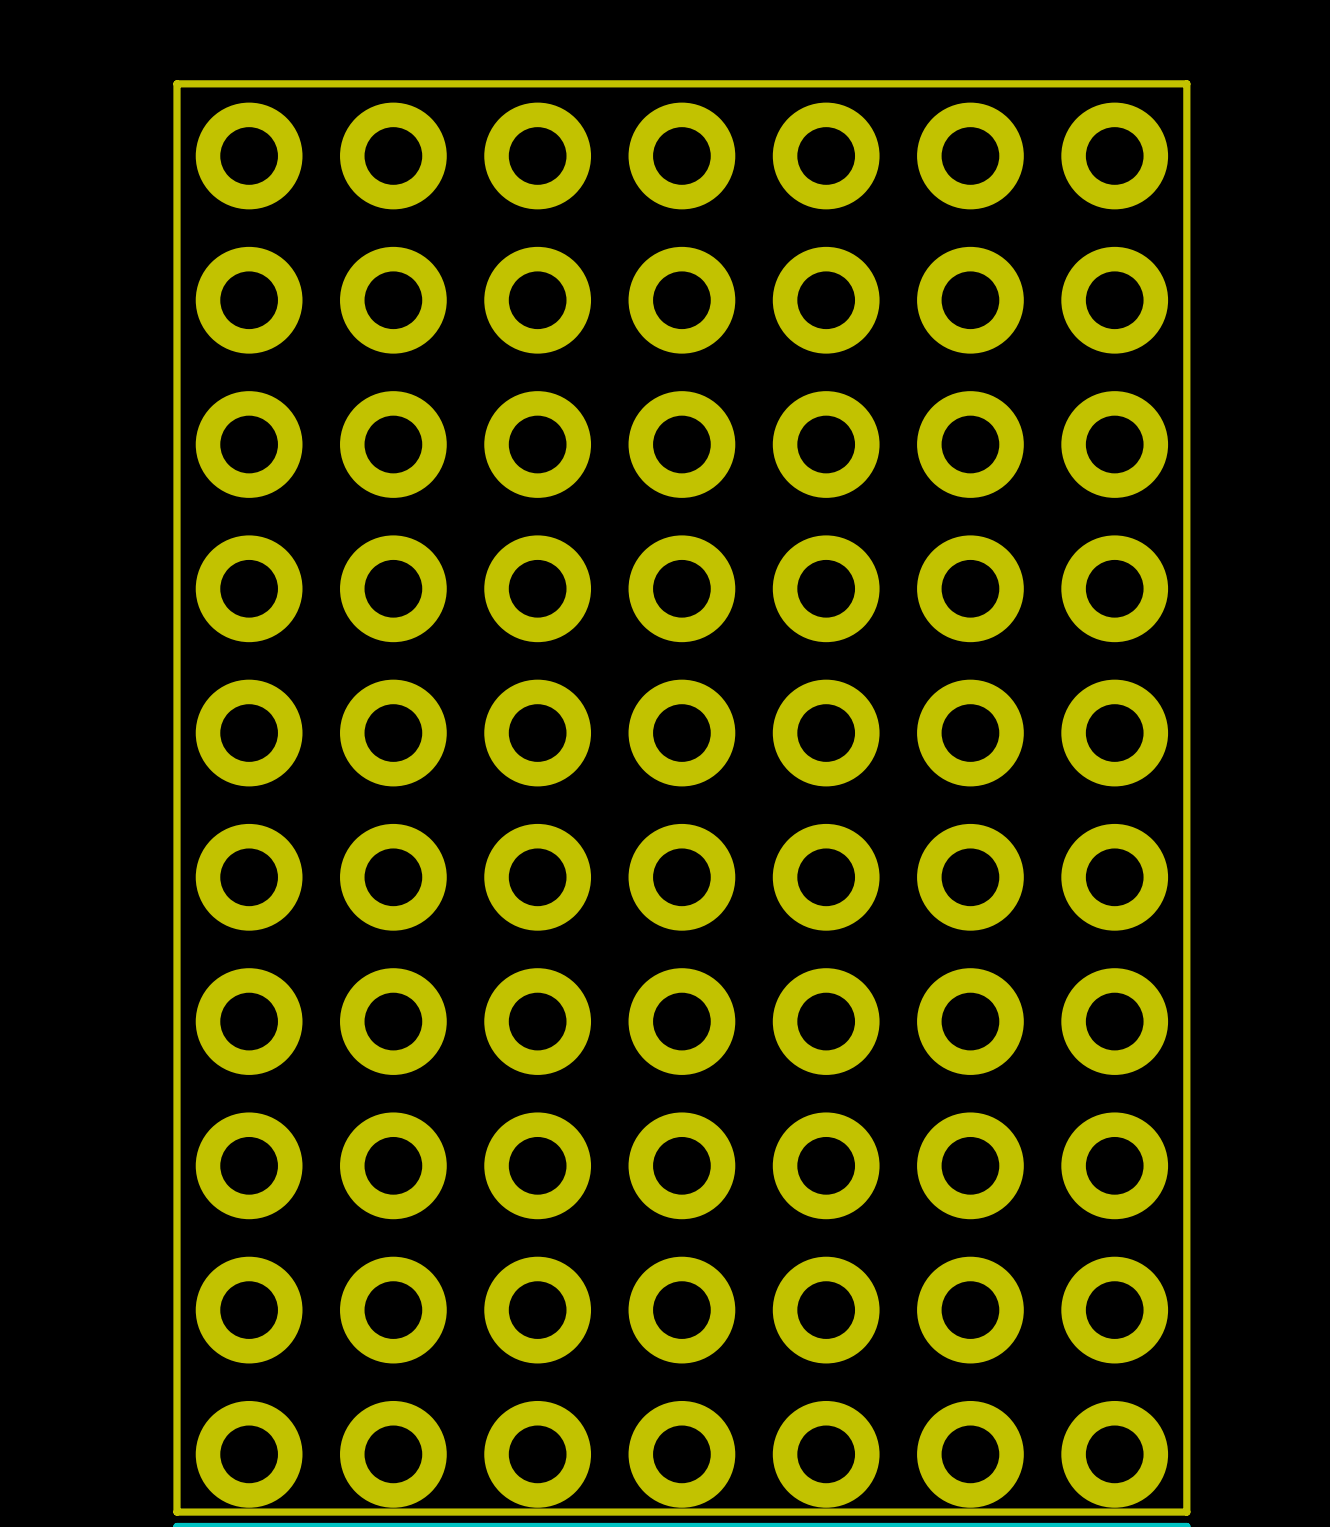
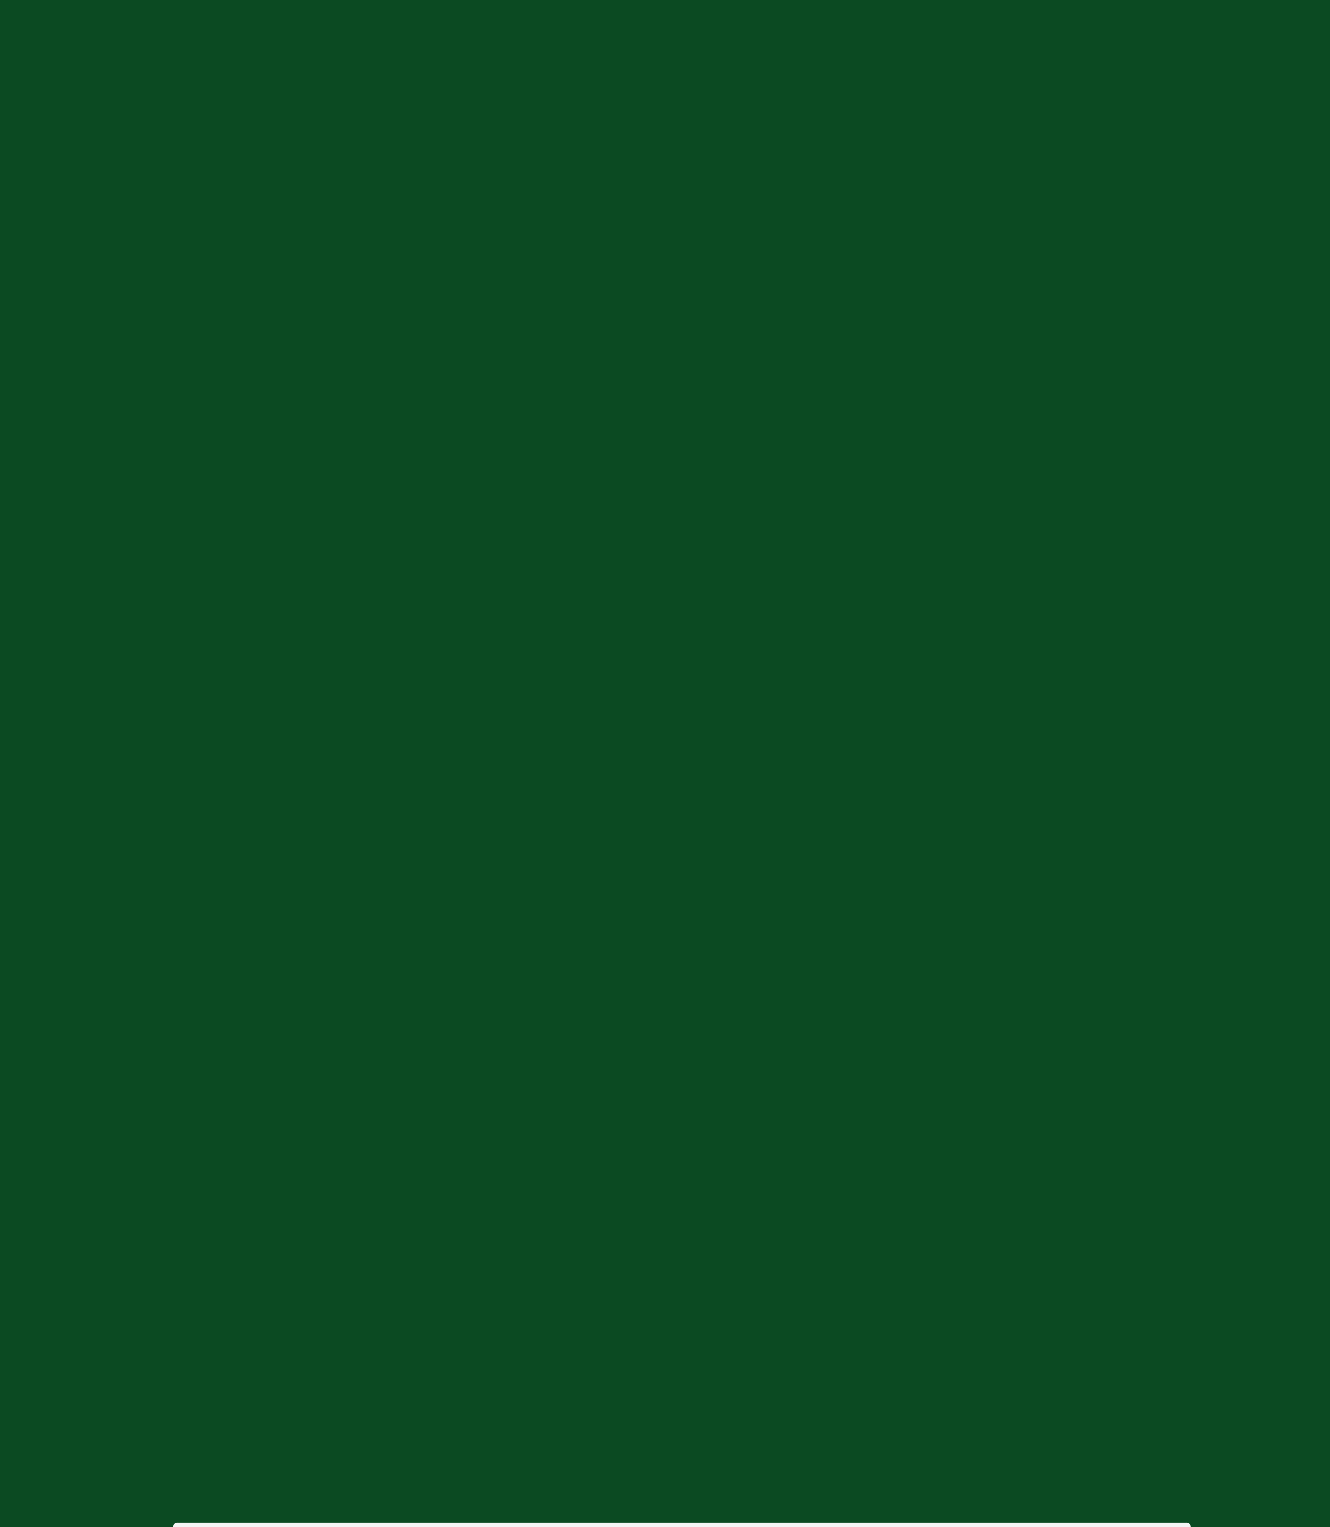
board edge: (1186, 83) (1186, 1512) (176, 1512) (176, 83) (1186, 83) -> none
part: (249, 805) -> none
part: (393, 805) -> none
part: (537, 805) -> none
part: (681, 805) -> none
part: (826, 805) -> none
part: (970, 805) -> none
part: (1114, 805) -> none

